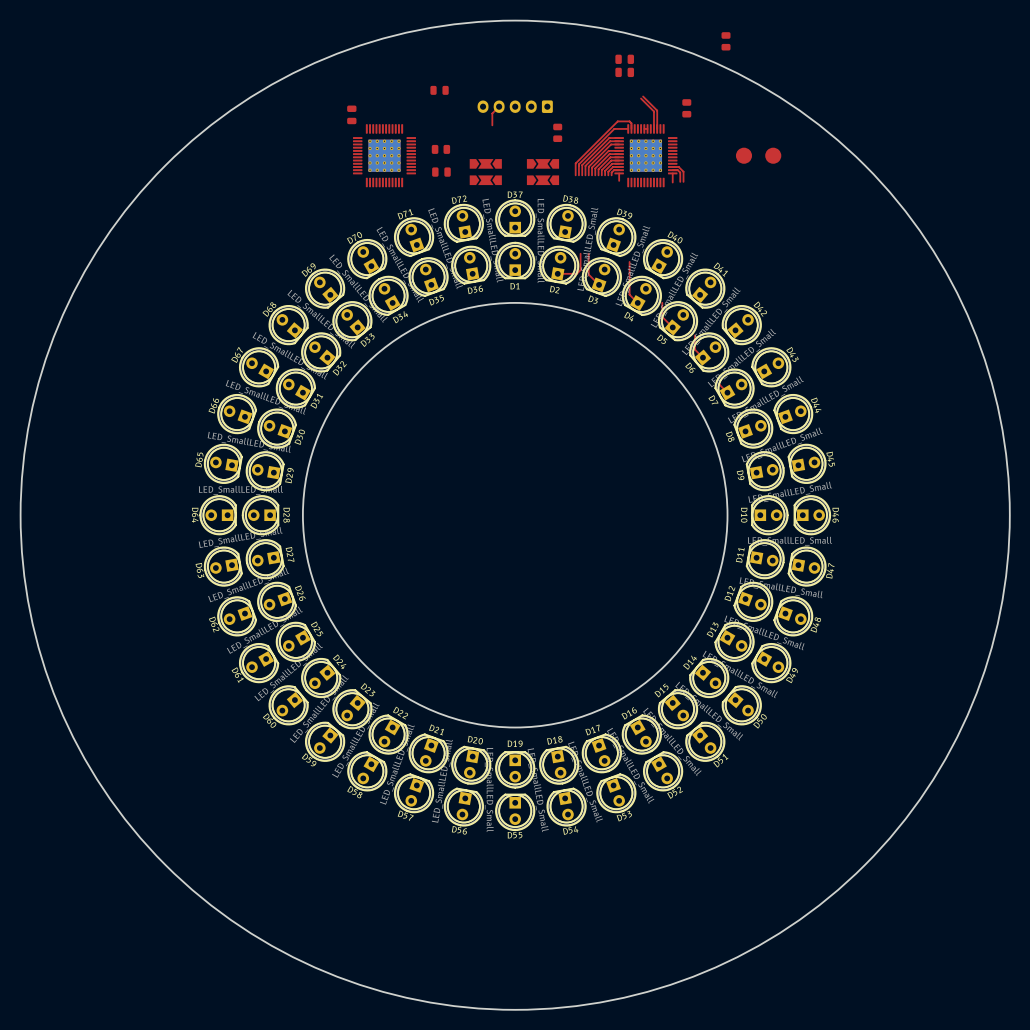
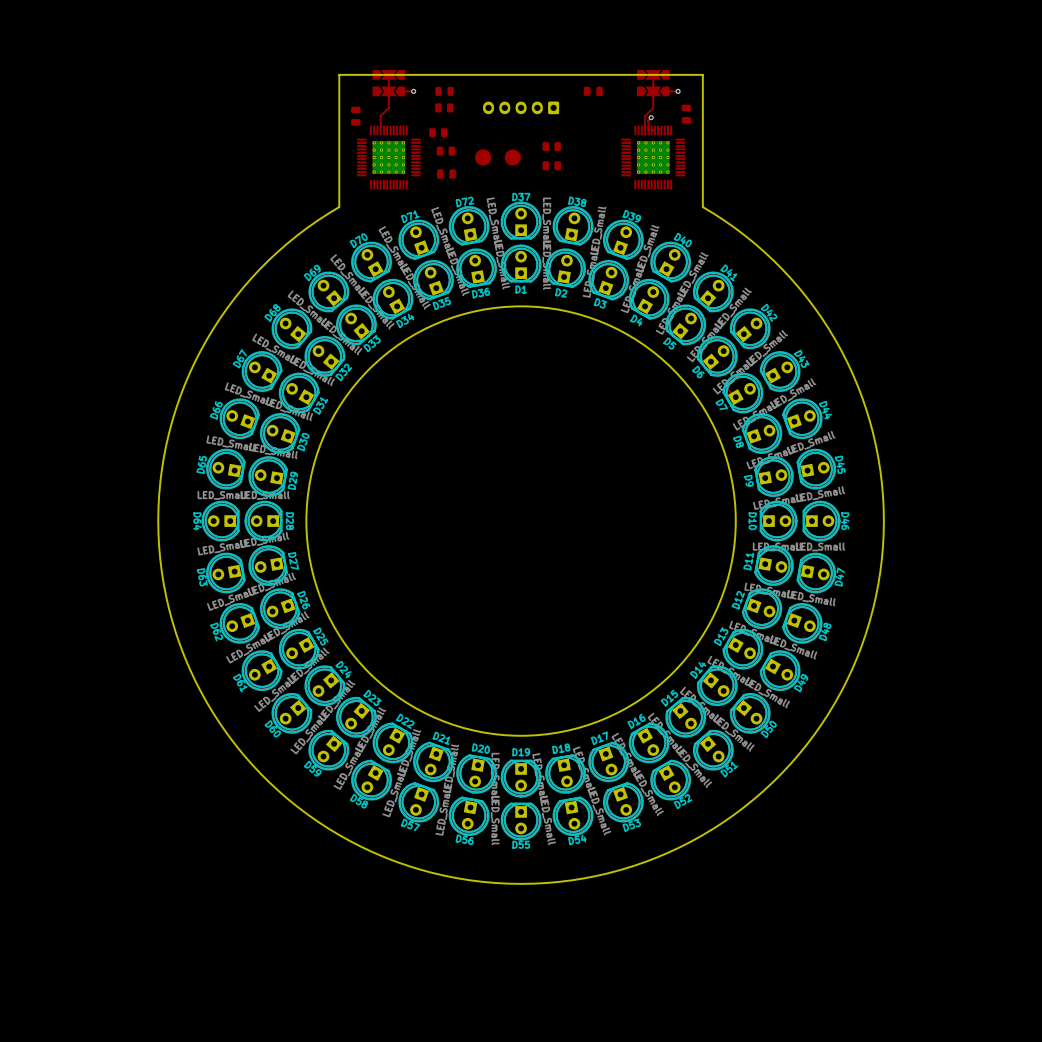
round board edge: [20, 20, 1011, 1011] -> none
part: (726, 41) -> none
part: (624, 59) -> none
part: (624, 72) -> none
top track: none -> (388, 74) (388, 107) (380, 116) (380, 130)
part: none -> (388, 74)
top track: none -> (653, 74) (653, 107) (645, 116) (645, 130)
part: none -> (653, 74)
board edge: none -> (702, 74) (702, 207) (734, 227) (764, 251) (790, 278) (814, 308) (847, 362) (862, 397) (873, 433) (881, 483) (882, 546) (873, 609) (857, 657) (841, 691) (821, 724) (781, 773) (734, 814) (702, 835) (668, 852) (633, 866) (596, 875) (558, 881) (521, 883) (458, 878) (421, 869) (385, 857) (350, 841) (318, 821) (269, 782) (227, 734) (206, 702) (189, 668) (176, 633) (166, 596) (158, 533) (159, 496) (163, 458) (172, 421) (184, 385) (206, 339) (242, 288) (287, 243) (339, 207) (339, 74) (702, 74)
part: none -> (388, 91)
top track: none -> (413, 91) (401, 91)
via: none -> (413, 91)
part: none -> (593, 91)
part: none -> (653, 91)
top track: none -> (678, 91) (666, 91)
via: none -> (678, 91)
top track: (643, 96) (657, 110) (657, 128) -> none
top track: (641, 98) (653, 111) (653, 128) -> none
part: none -> (444, 107)
top track: (499, 106) (492, 113) (492, 125) -> none
part: (686, 108) -> none
part: none -> (686, 114)
top track: none -> (651, 117) (648, 120) (648, 130)
via: none -> (651, 117)
top track: (628, 128) (614, 128) (578, 164) (578, 175) -> none
top track: (631, 128) (629, 121) (617, 121) (575, 163) (575, 175) -> none
part: none -> (438, 132)
part rotation: 0° (557, 132) -> 90° clockwise (551, 146)
part position: (557, 132) -> (551, 146)
top track: (619, 138) (609, 138) (582, 165) (582, 175) -> none
top track: (619, 141) (610, 141) (585, 165) (585, 175) -> none
top track: (619, 144) (611, 144) (588, 166) (588, 175) -> none
top track: (619, 150) (608, 150) (592, 167) (592, 175) -> none
top track: (619, 154) (609, 154) (595, 168) (595, 175) -> none
part: none -> (483, 157)
part: none -> (512, 157)
part: (743, 155) -> none
part: (773, 155) -> none
top track: (619, 157) (610, 157) (598, 169) (598, 175) -> none
part footprint: [526, 159, 560, 169] -> [542, 161, 562, 171]
top track: (619, 160) (611, 160) (601, 170) (601, 175) -> none
part: (485, 163) -> none
top track: (619, 163) (612, 163) (605, 170) (605, 175) -> none
top track: (619, 166) (613, 166) (608, 171) (608, 175) -> none
top track: (672, 166) (678, 166) (683, 171) (683, 181) -> none
top track: (619, 170) (613, 170) (611, 175) -> none
top track: (672, 170) (677, 170) (680, 172) (680, 181) -> none
top track: (619, 173) (619, 180) -> none
top track: (672, 173) (672, 182) -> none
part: (485, 180) -> none
part: (542, 180) -> none
top track: (580, 253) (580, 270) (576, 273) (557, 273) -> none
top track: (588, 253) (588, 274) (599, 284) -> none
top track: (629, 261) (629, 294) (637, 302) -> none
top track: (662, 302) (662, 316) (672, 327) -> none
top track: (694, 335) (694, 349) (702, 357) -> none

